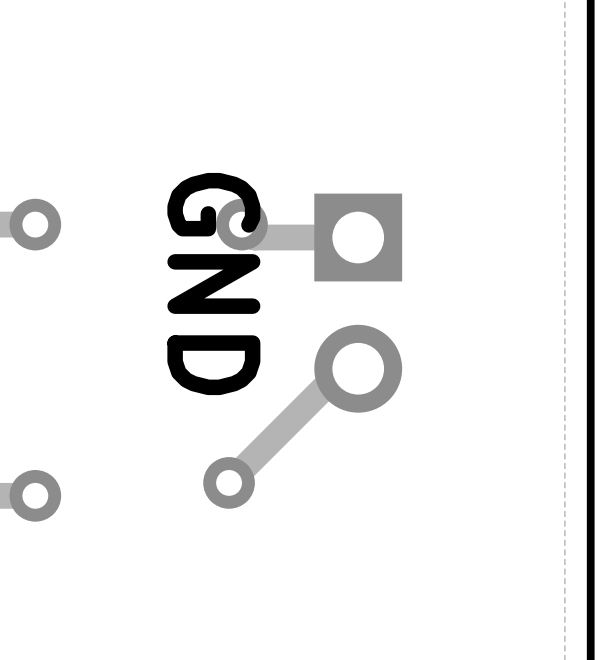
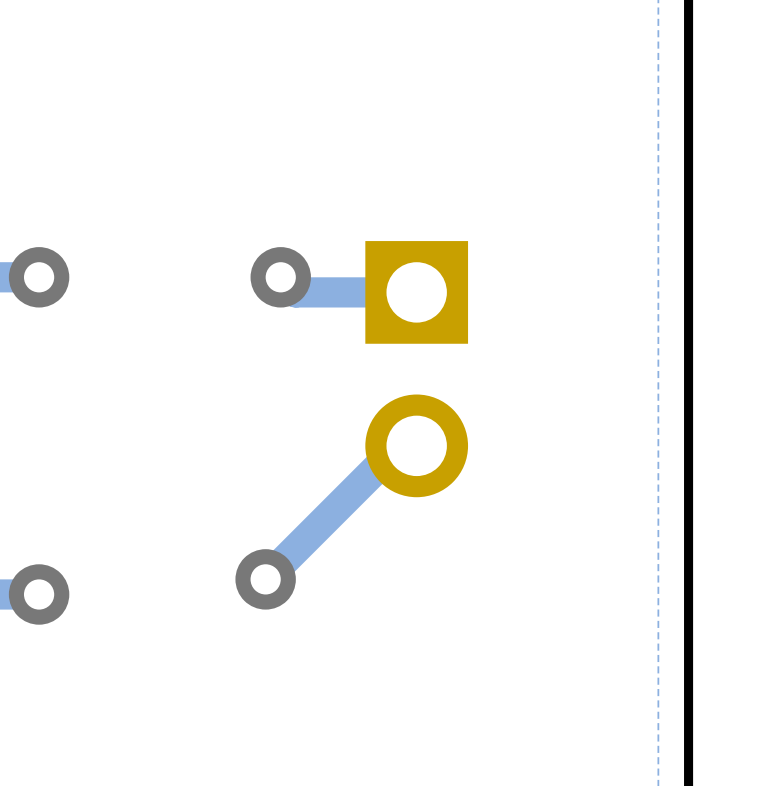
text: GND (213, 284) -> none

